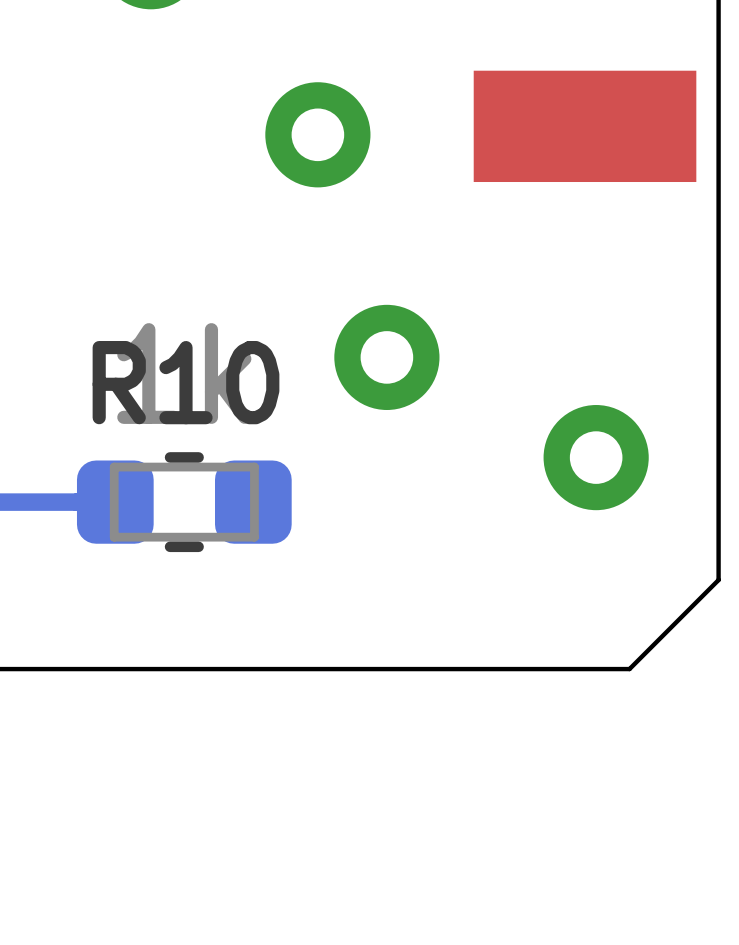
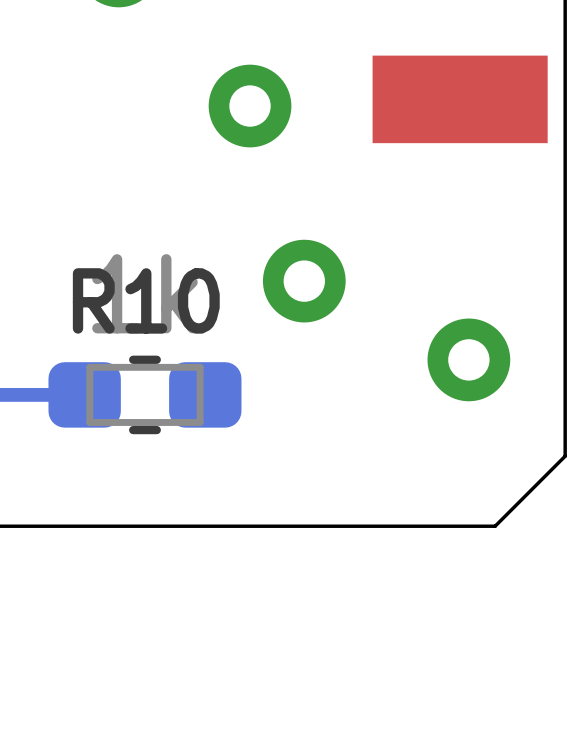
R10 footprint: [76, 452, 292, 553] -> [48, 355, 242, 435]

